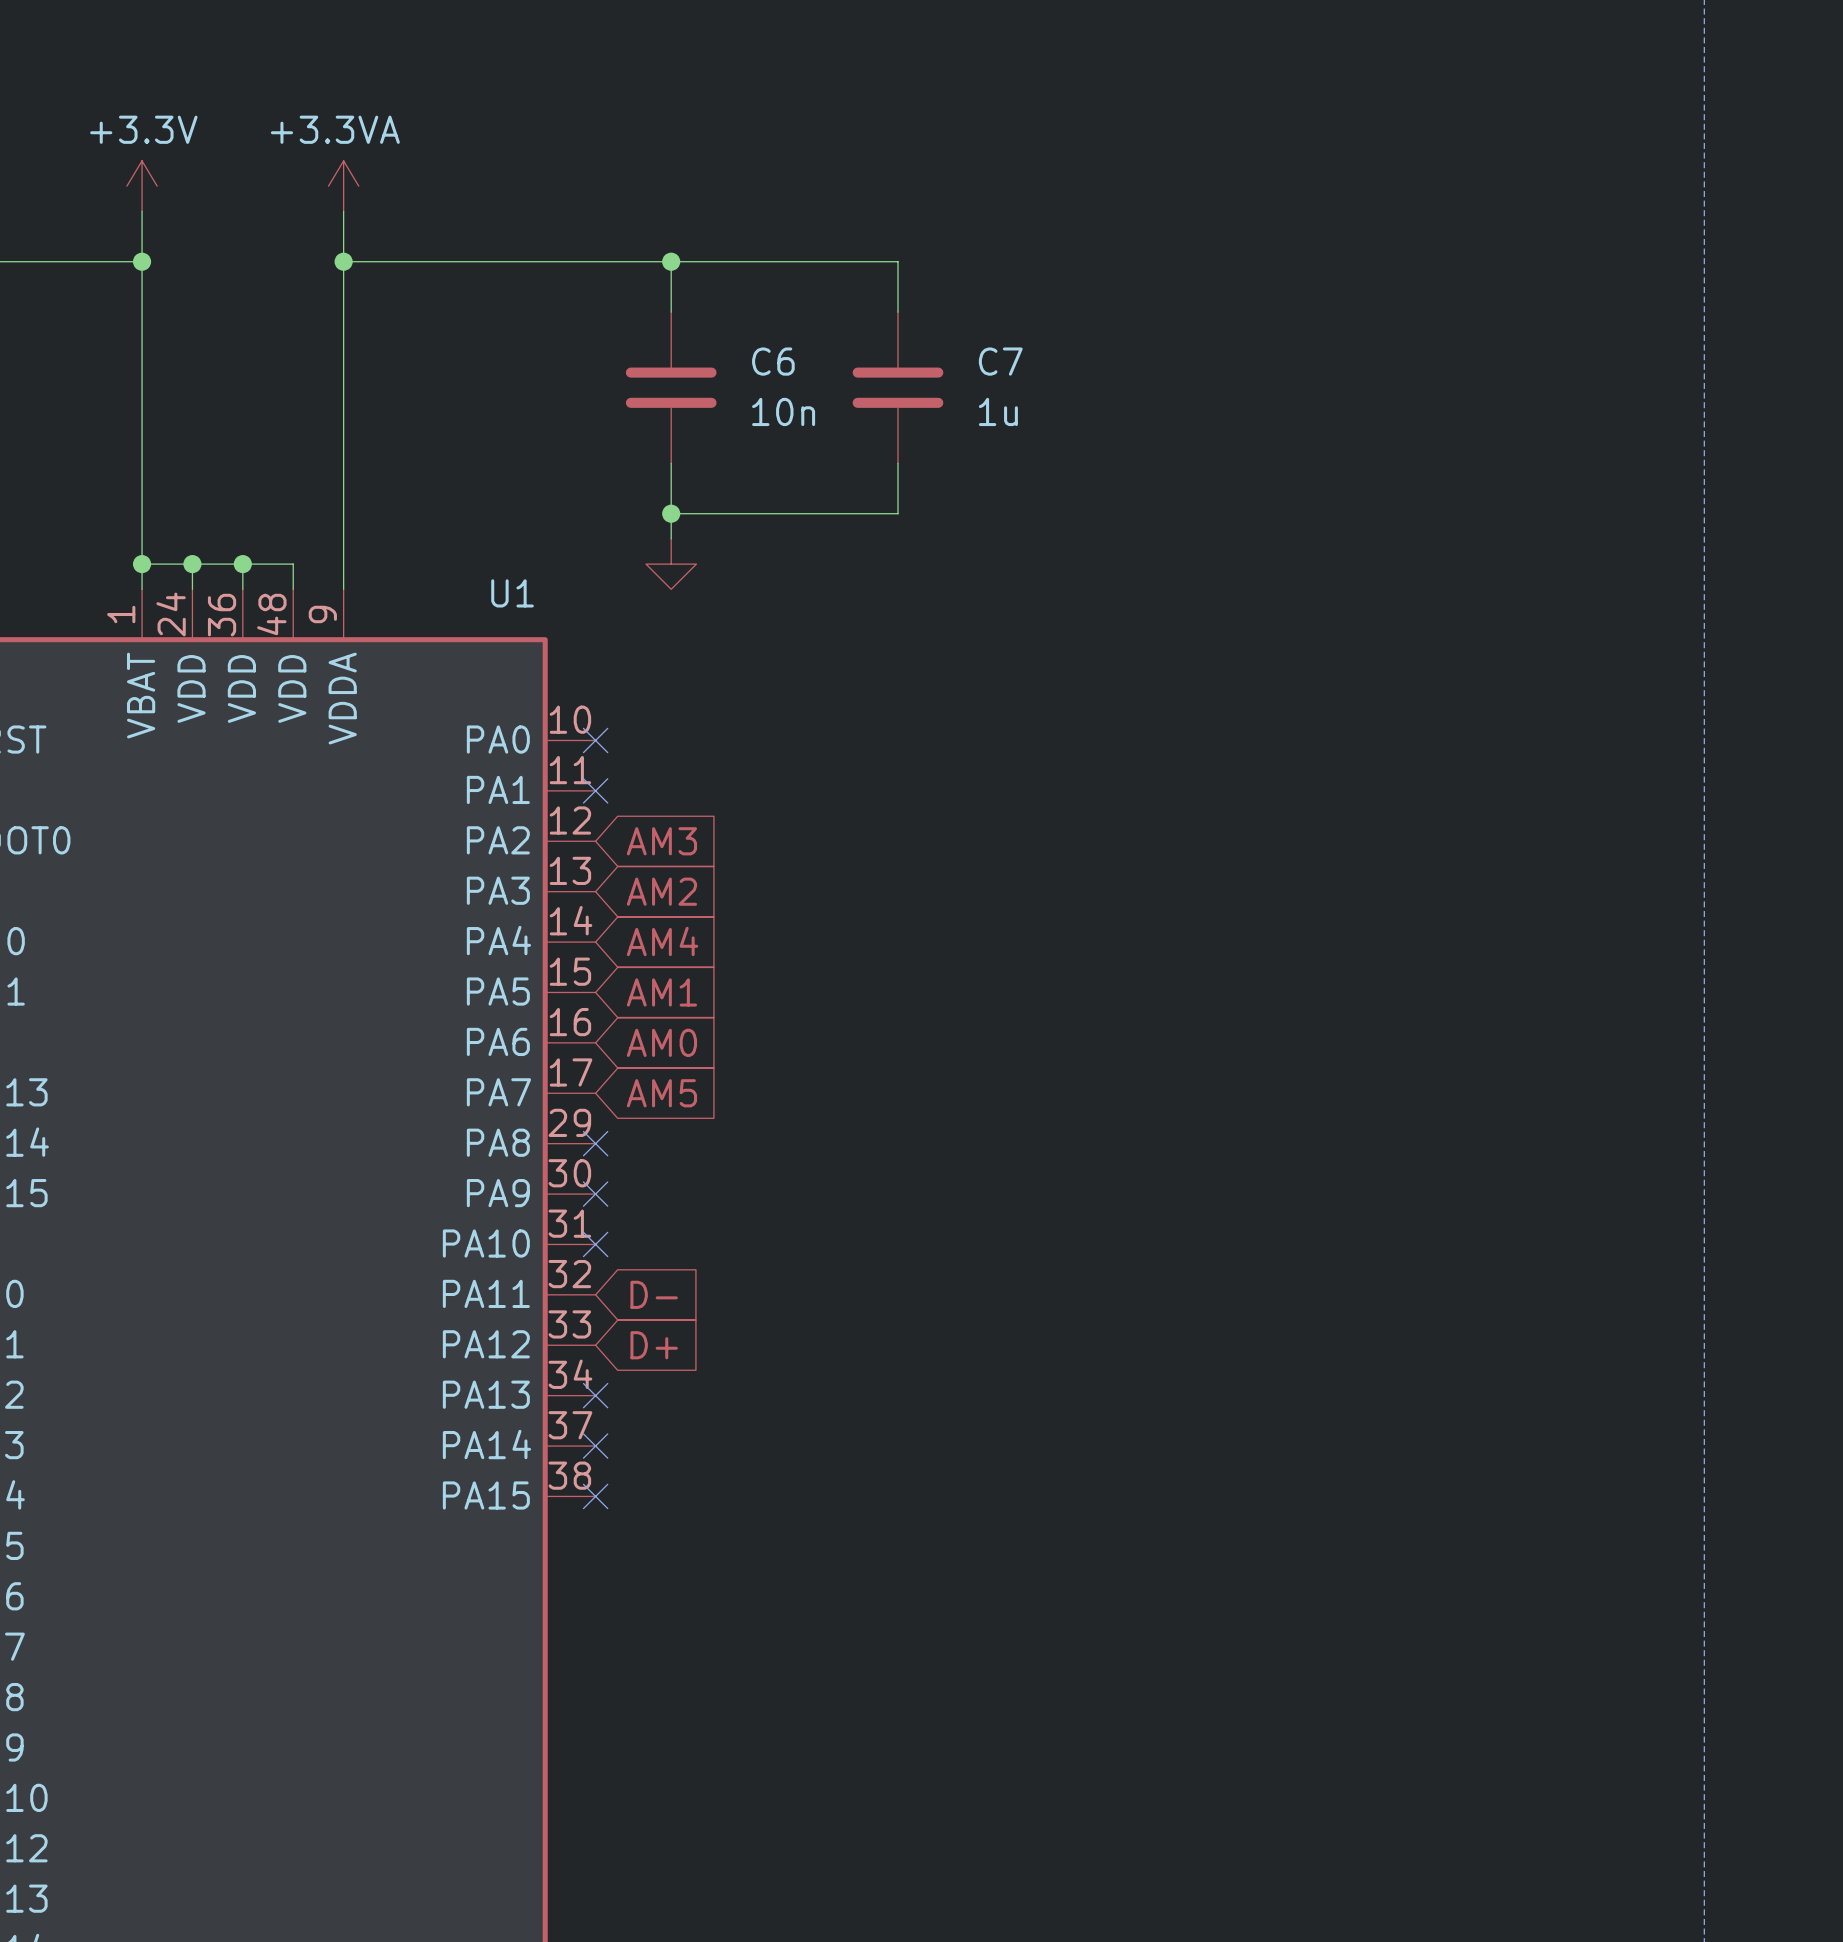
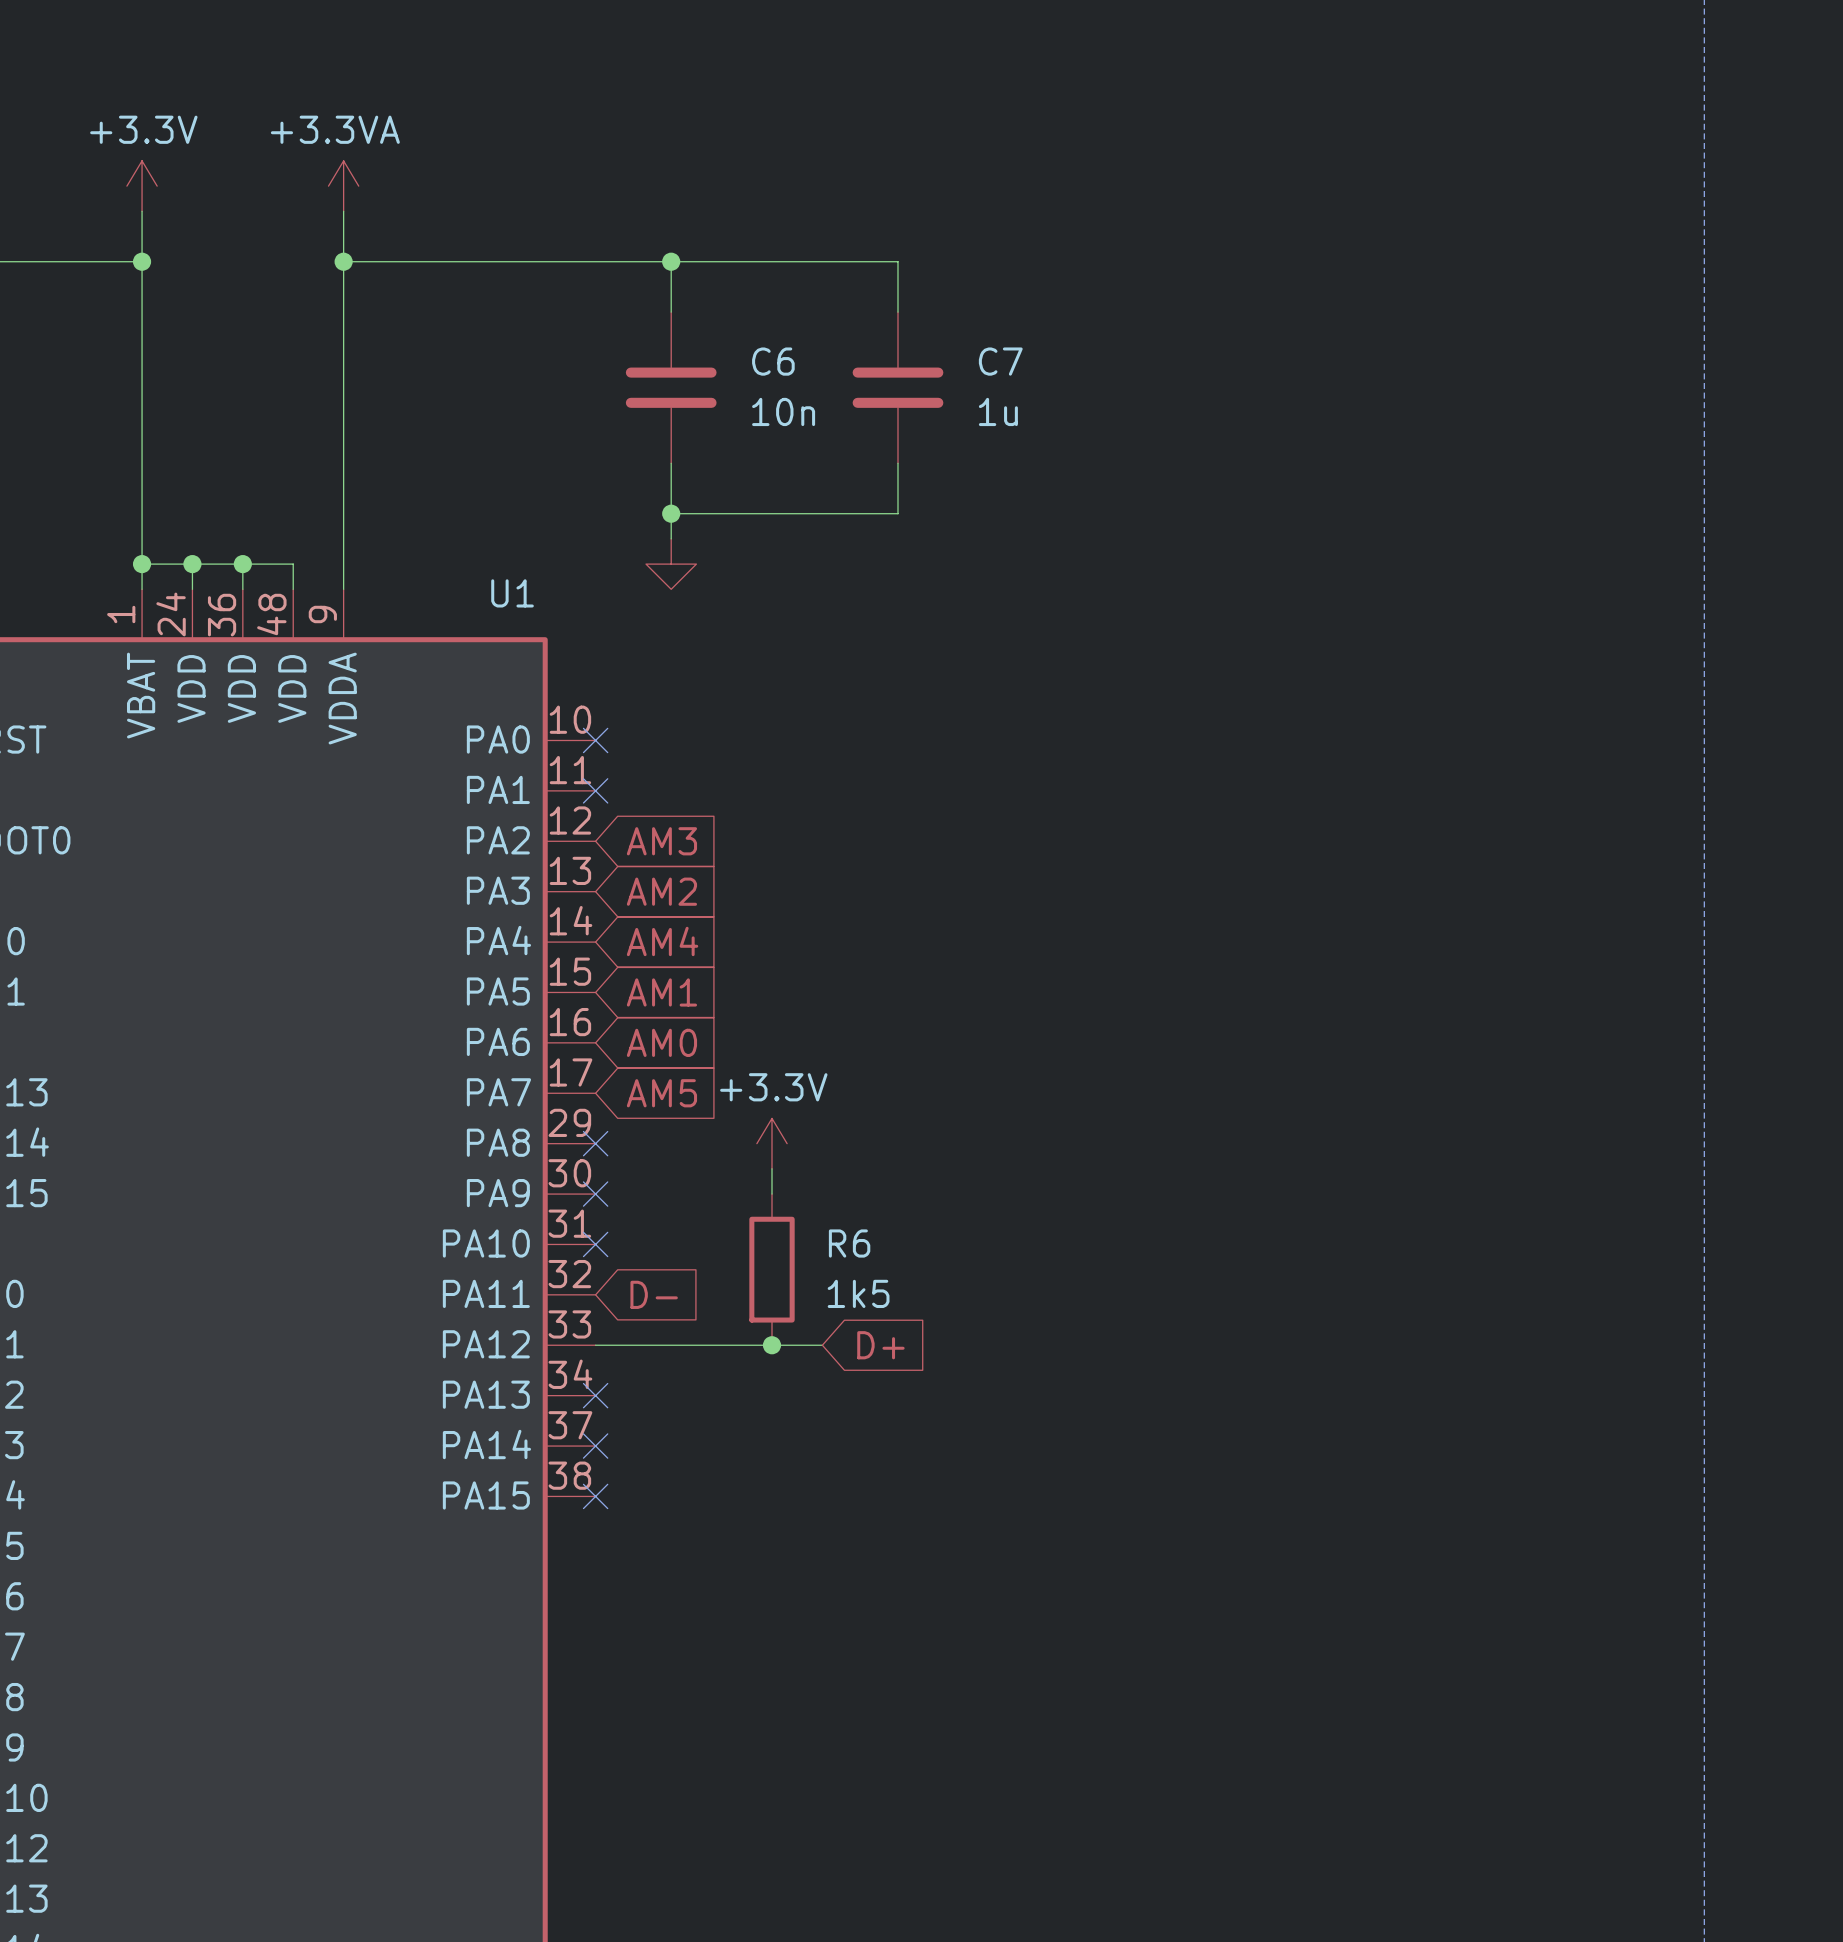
power symbol: none -> +3.3V (772, 1143)
wire: none -> (772, 1168) (772, 1194)
R6: none -> 1k5 (772, 1269)
wire: none -> (595, 1345) (822, 1345)
global label position: D+ (654, 1345) -> D+ (880, 1345)
junction: none -> (772, 1345)

